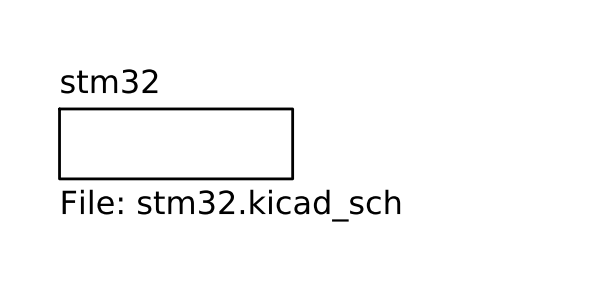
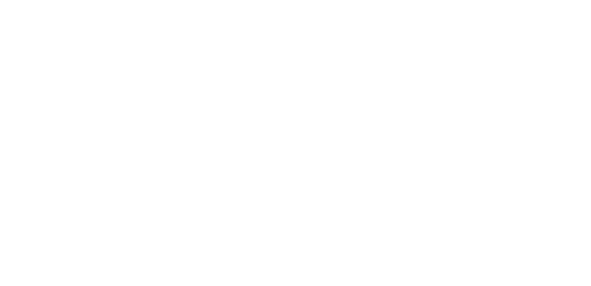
sheet stm32: File: stm32.kicad_sch (176, 143) -> none

